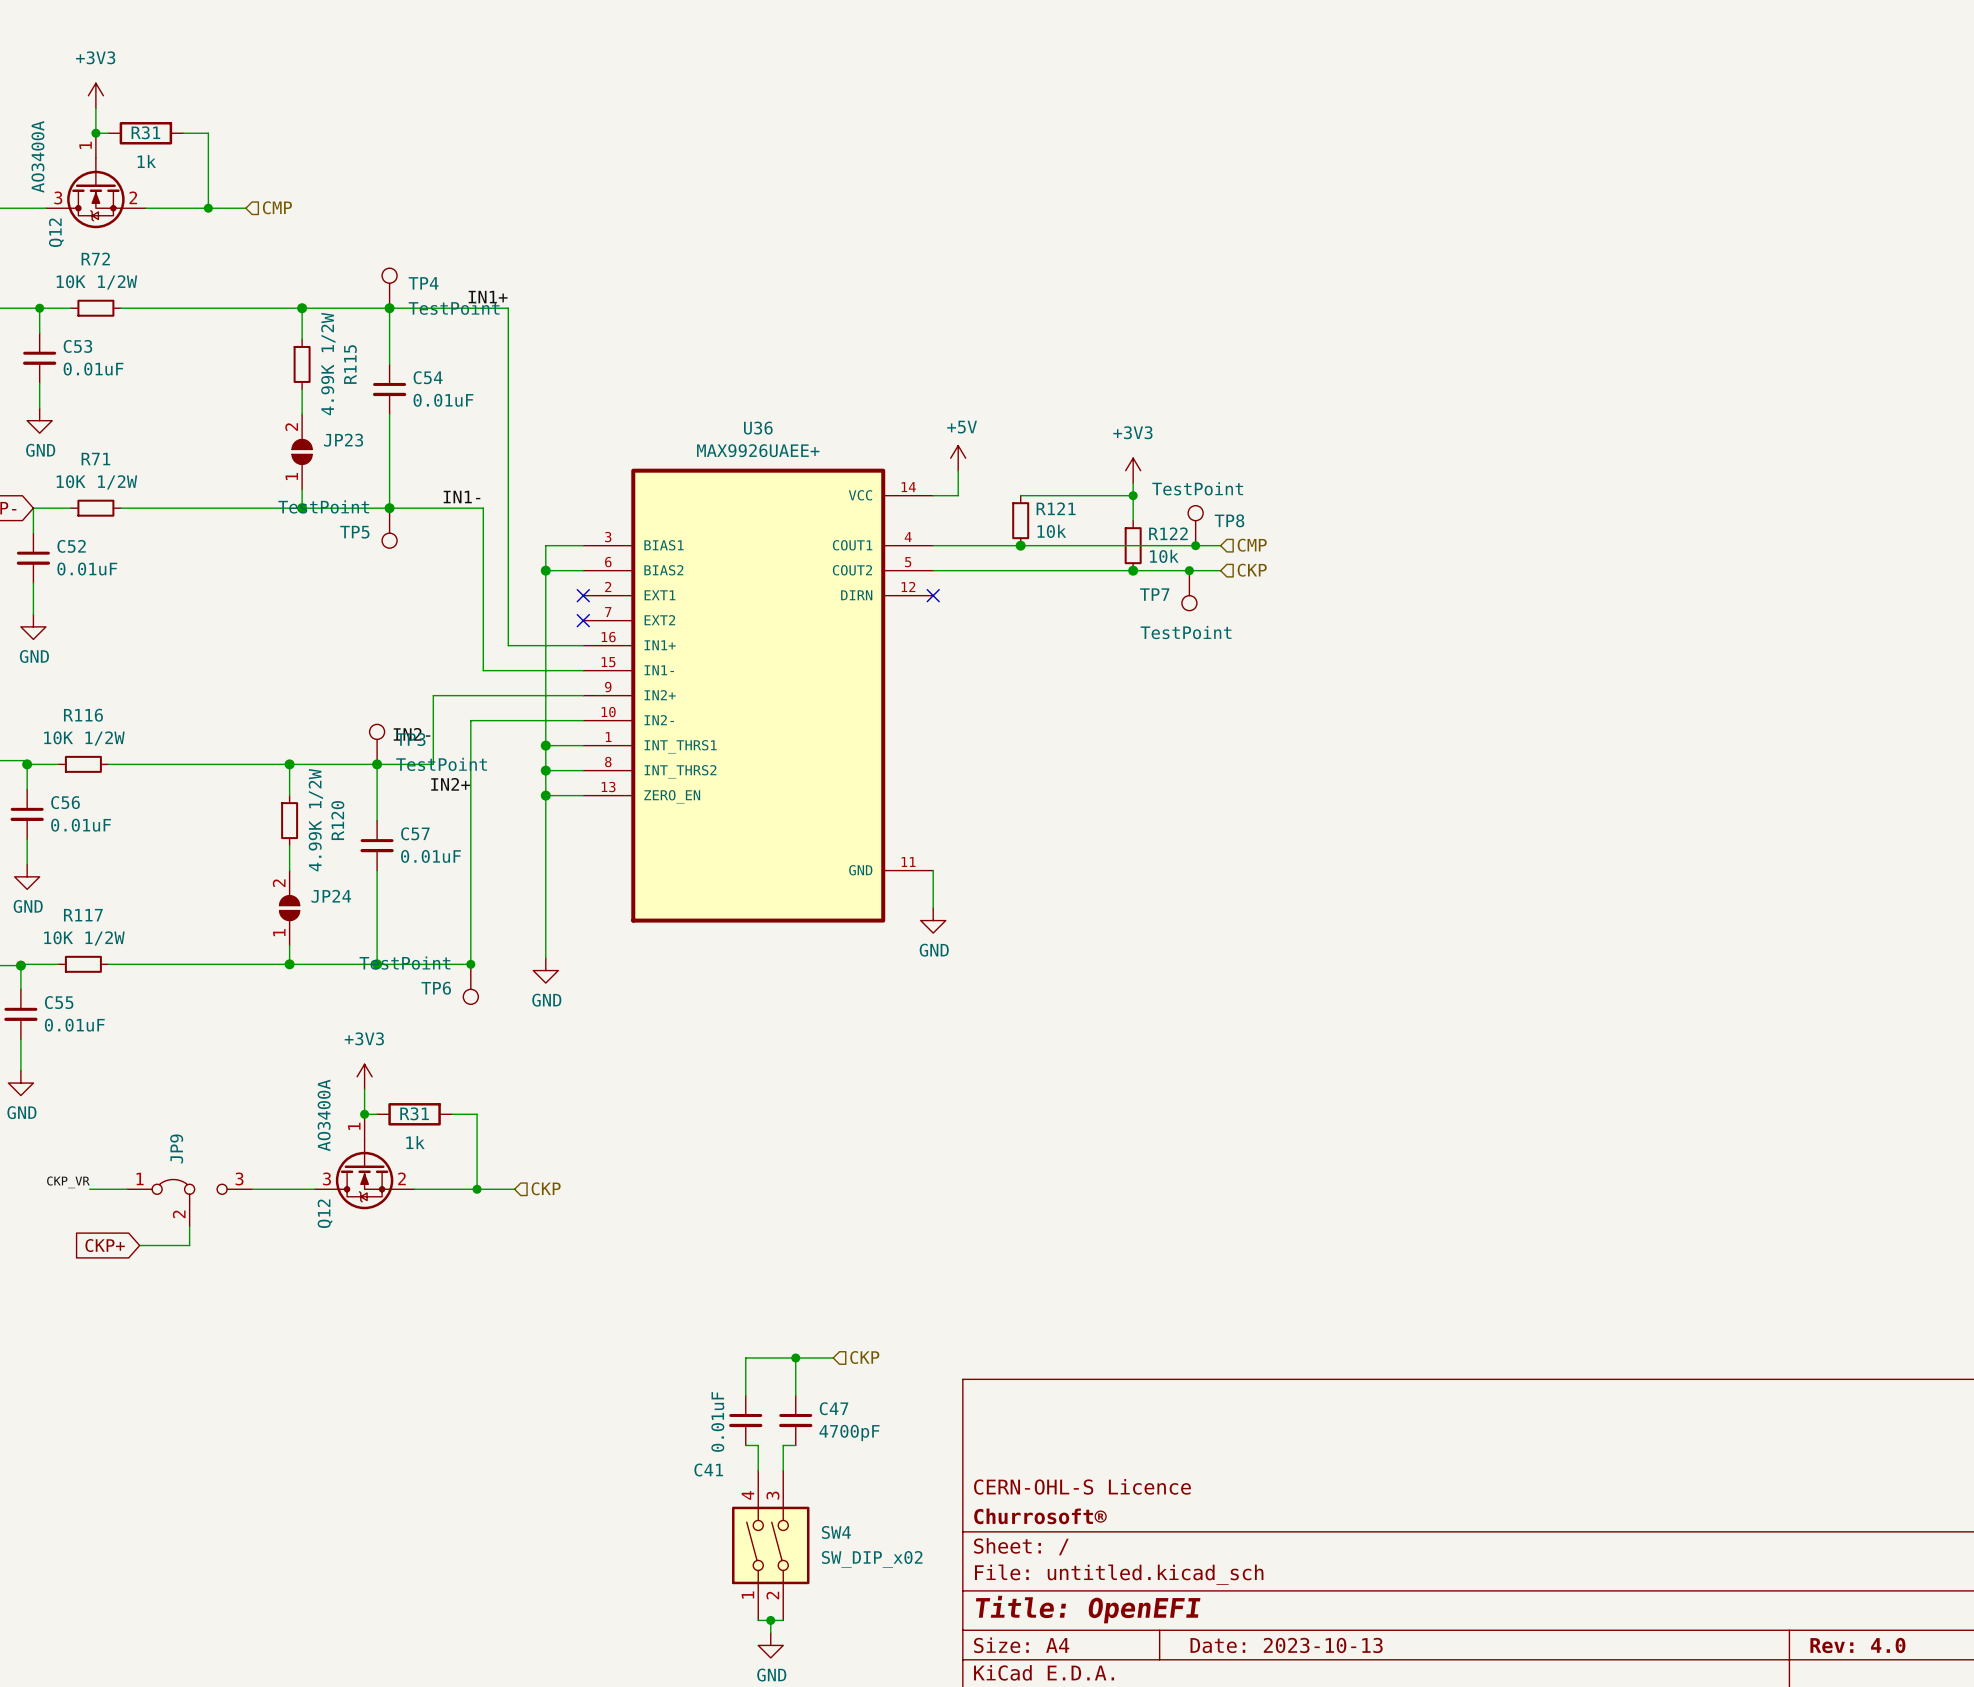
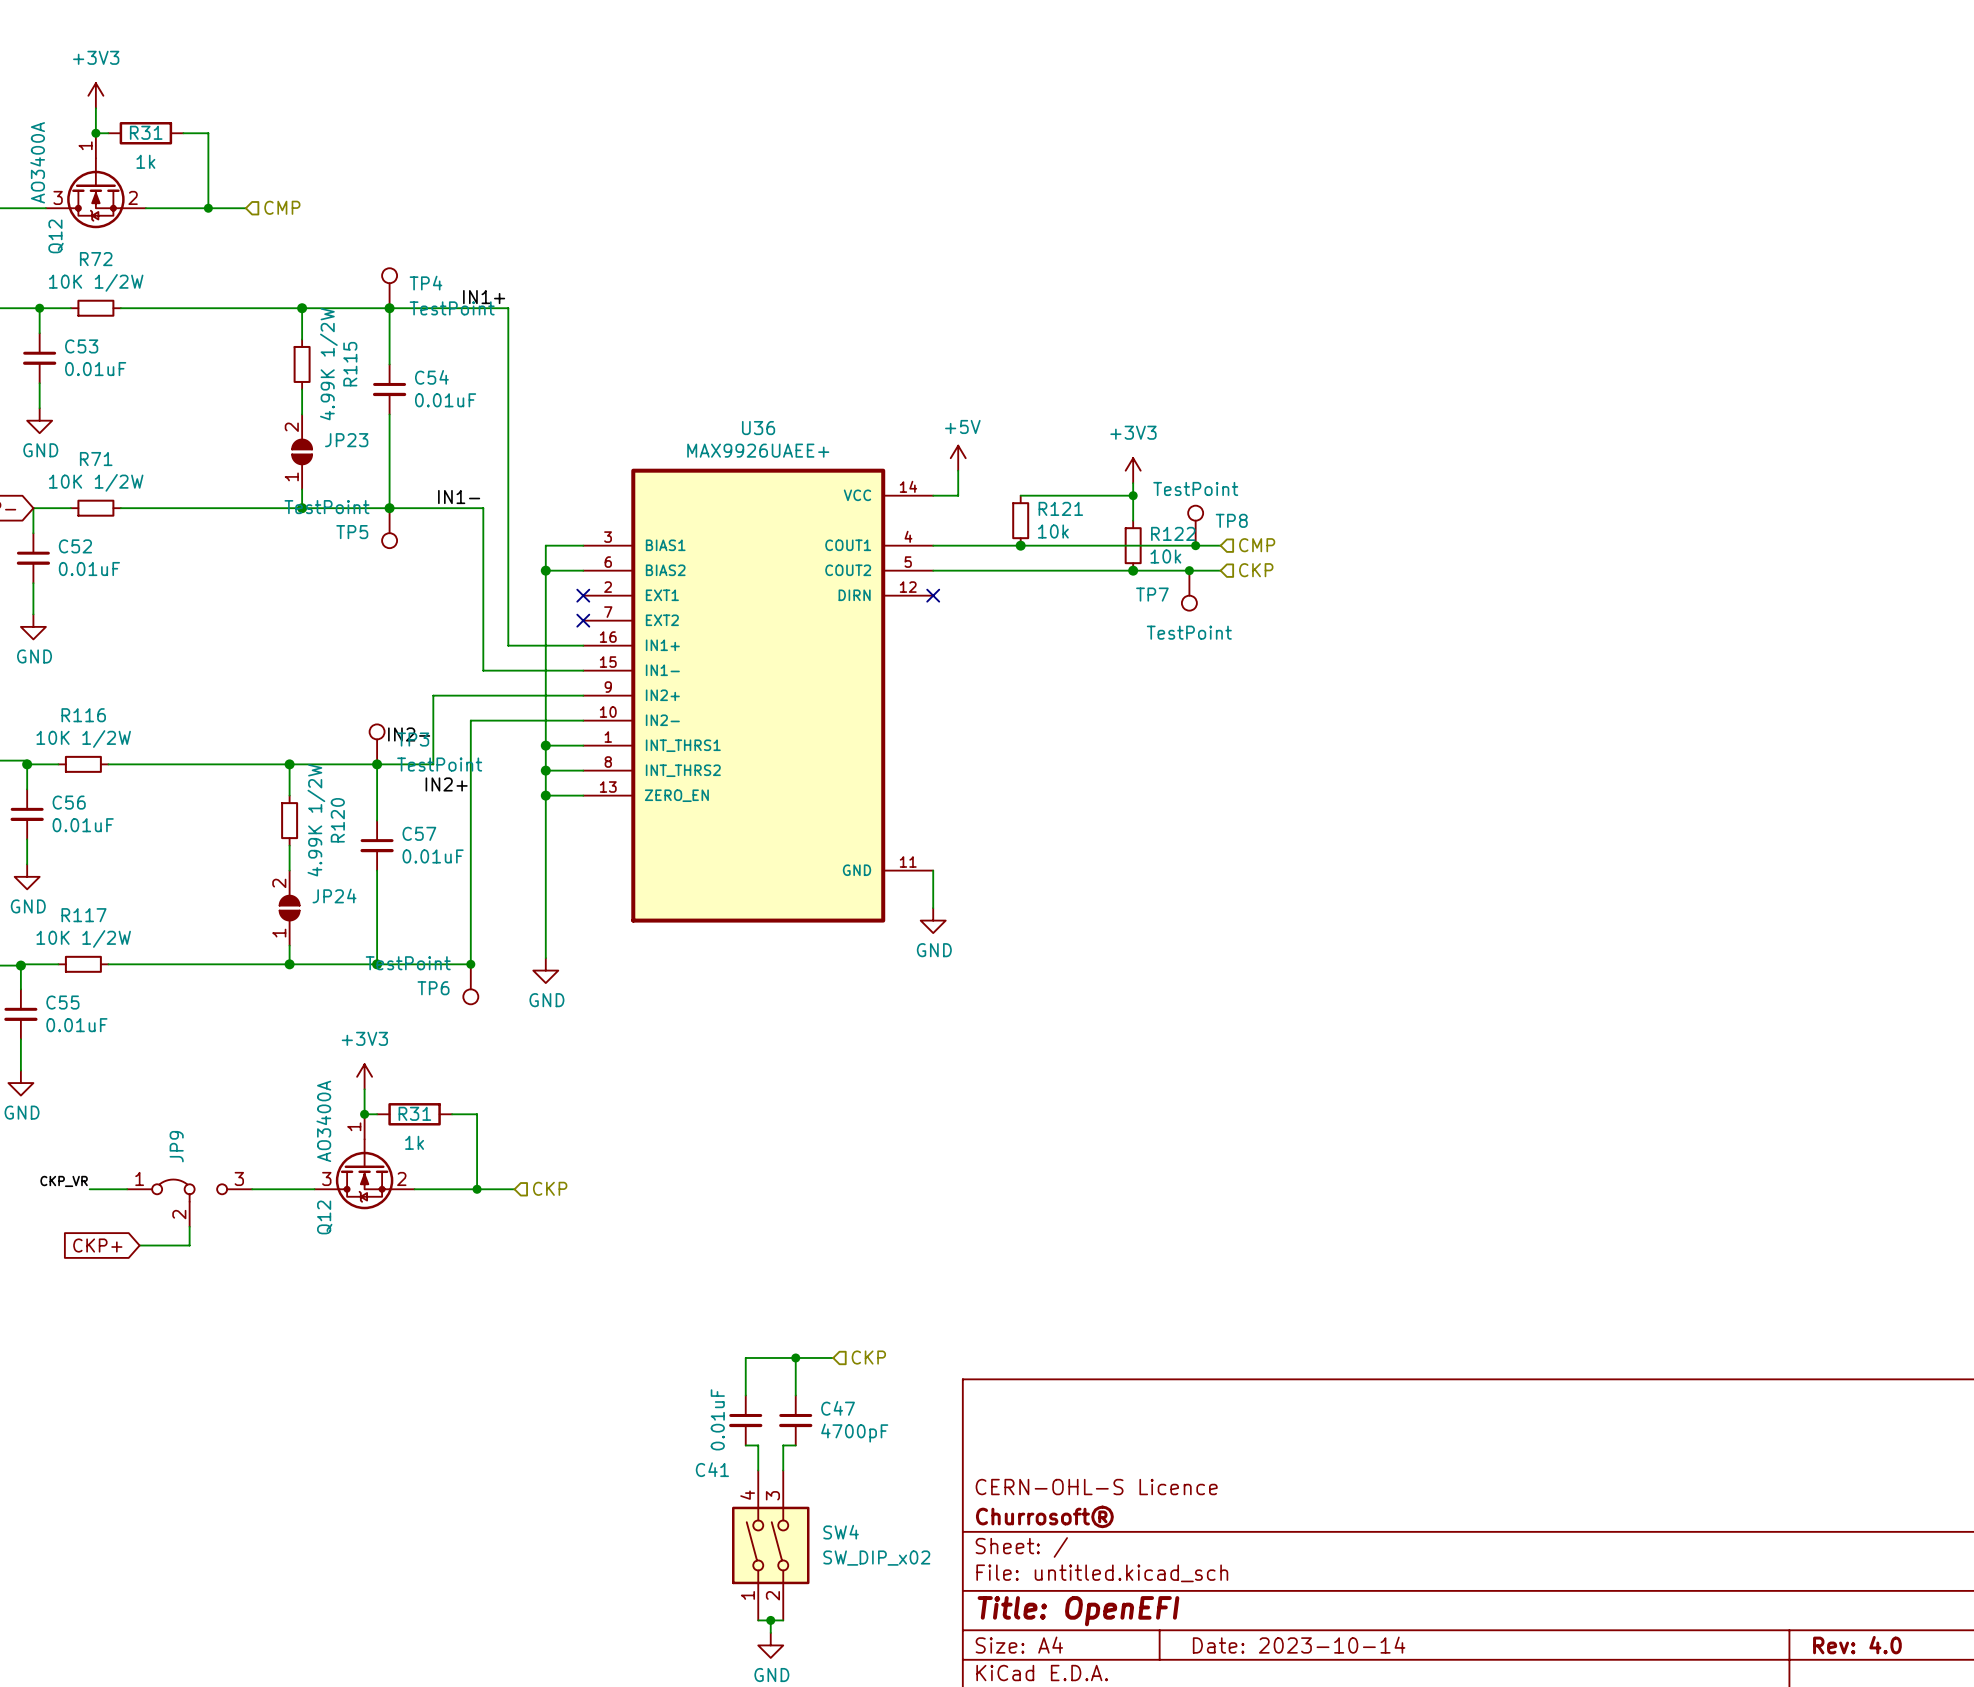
title block: Date: 2023-10-13 (1286, 1645) -> Date: 2023-10-14 (1299, 1645)

